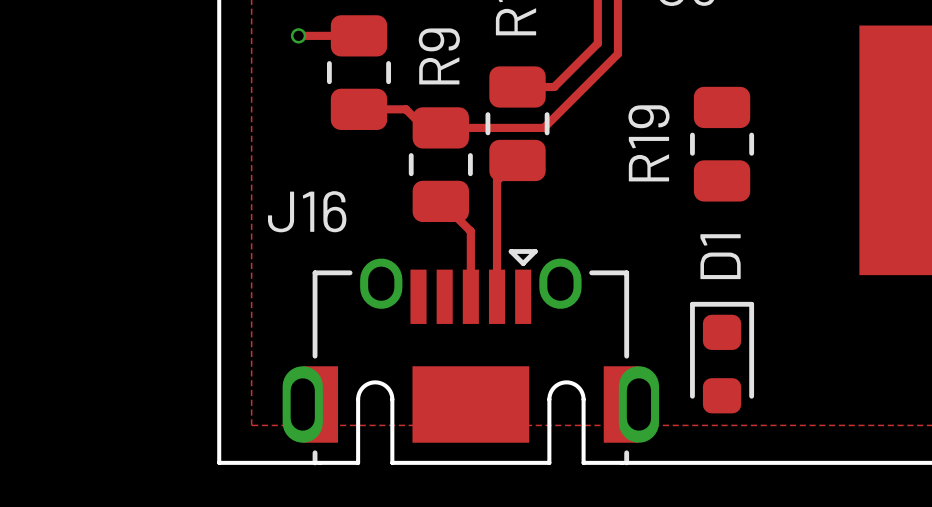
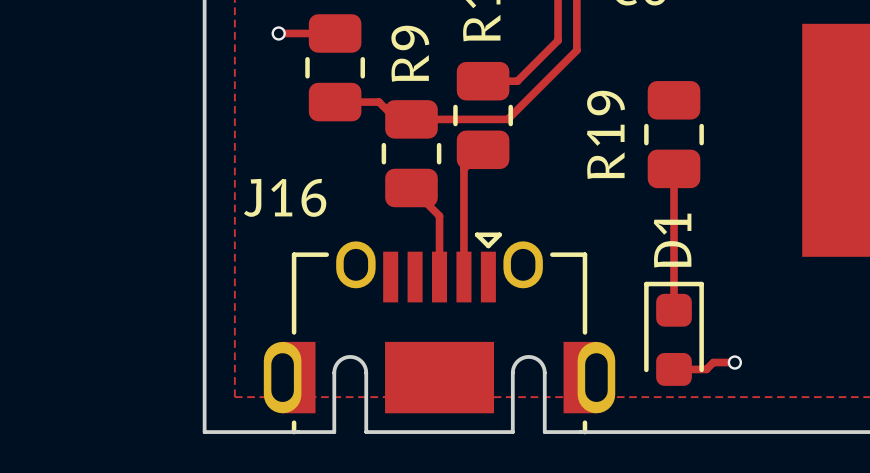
track: none -> (674, 168) (674, 310)
track: none -> (734, 362) (713, 362) (706, 369) (674, 369)
via: none -> (734, 362)

